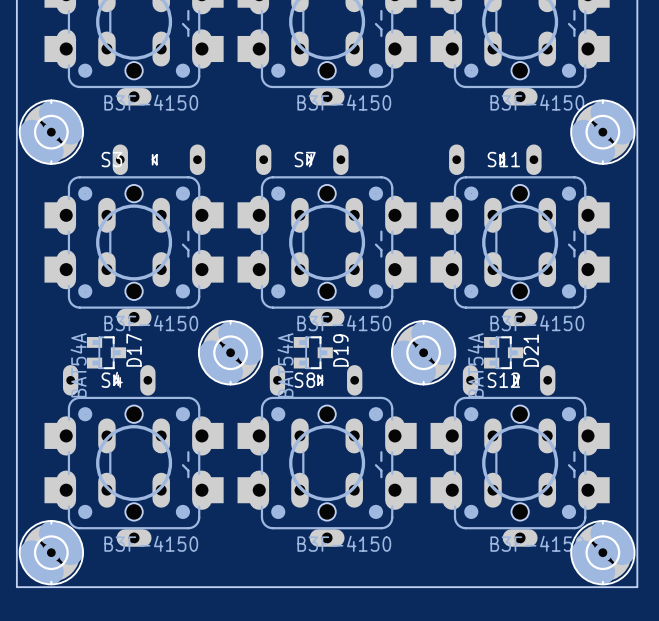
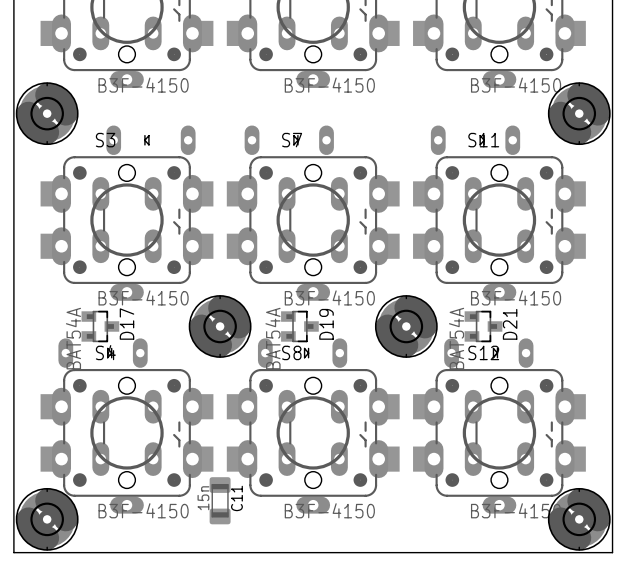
C11: none -> 15n (220, 500)

